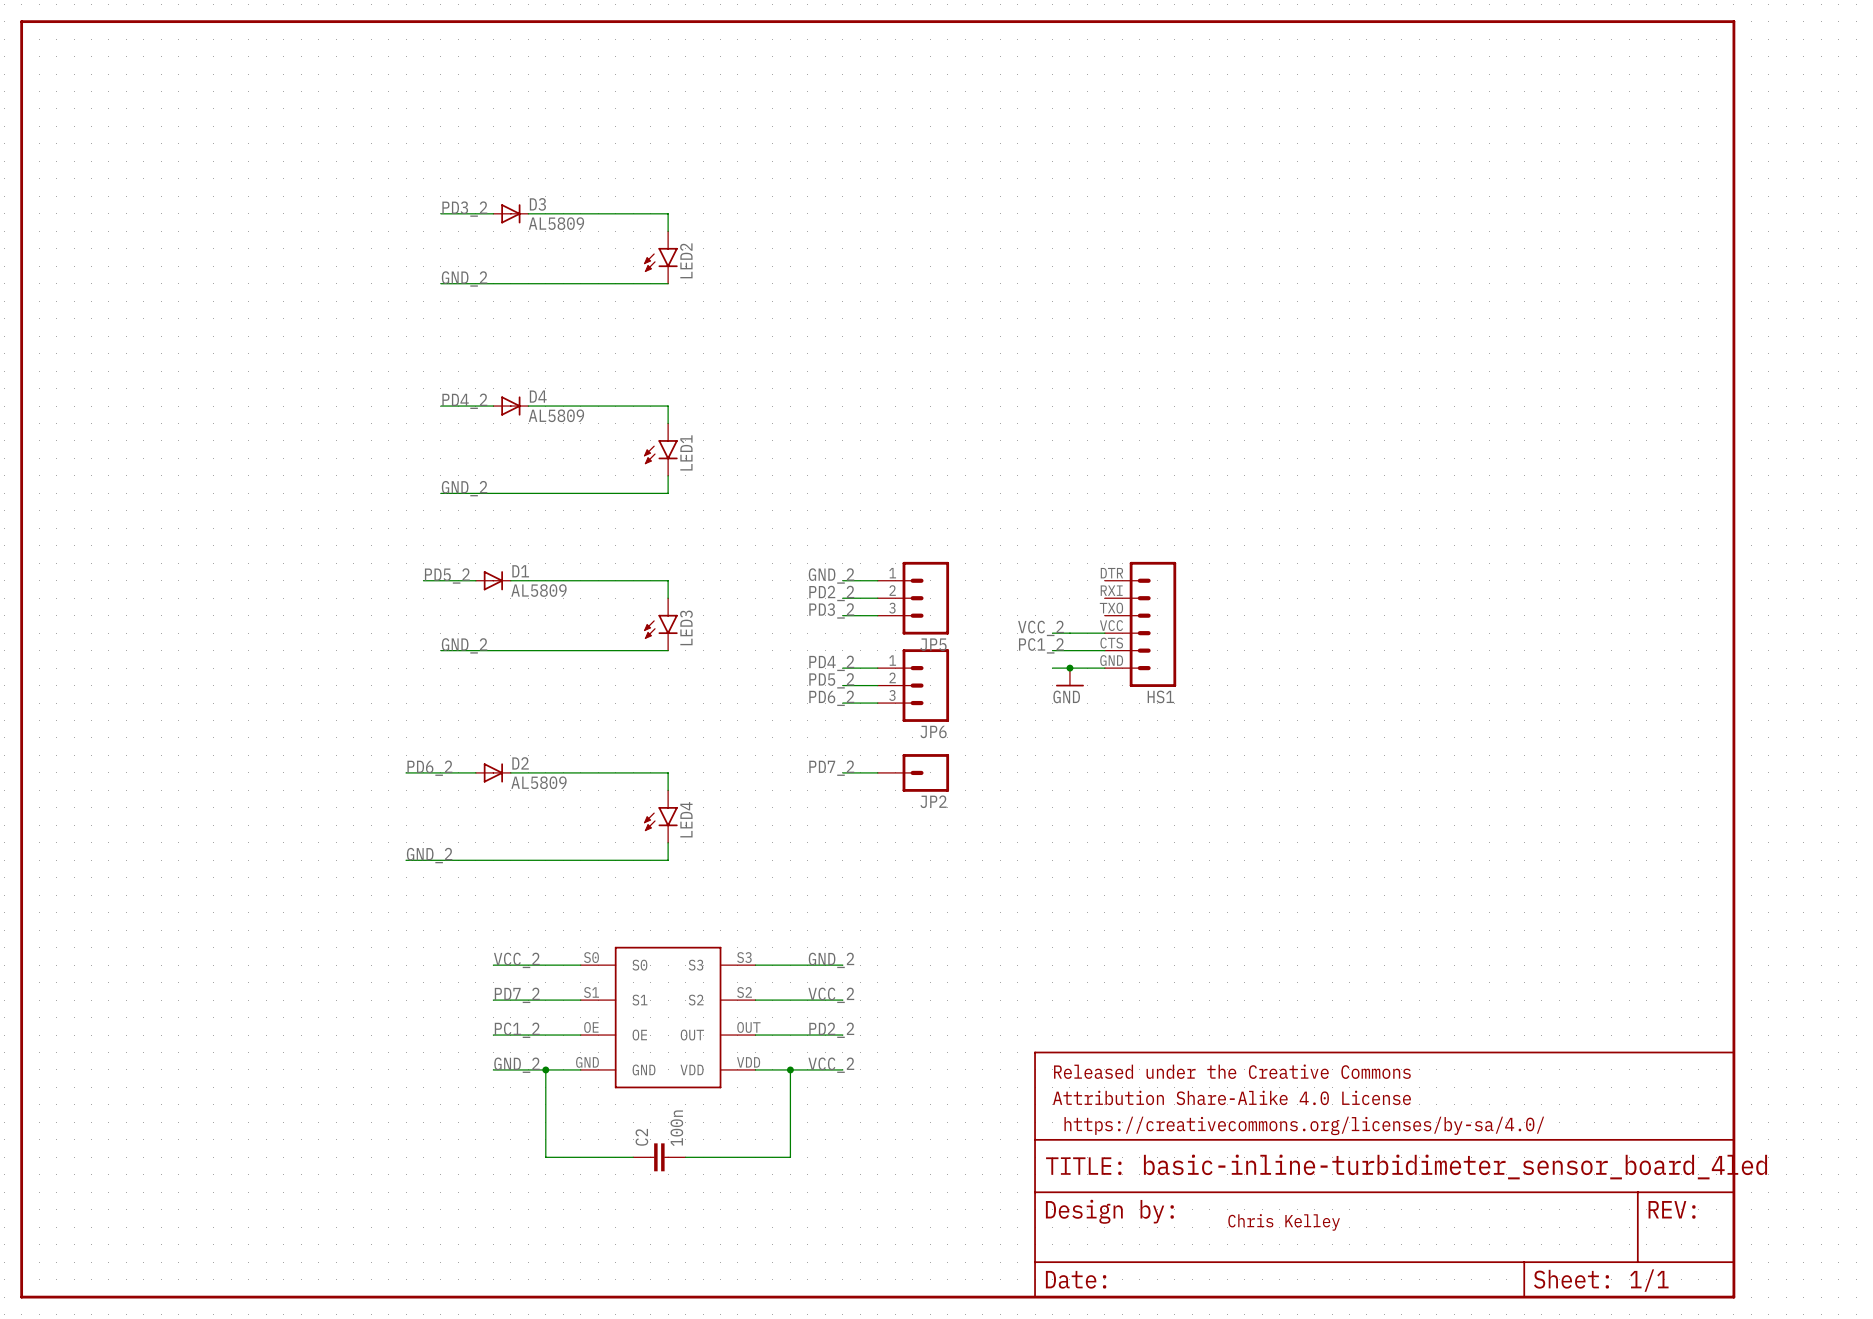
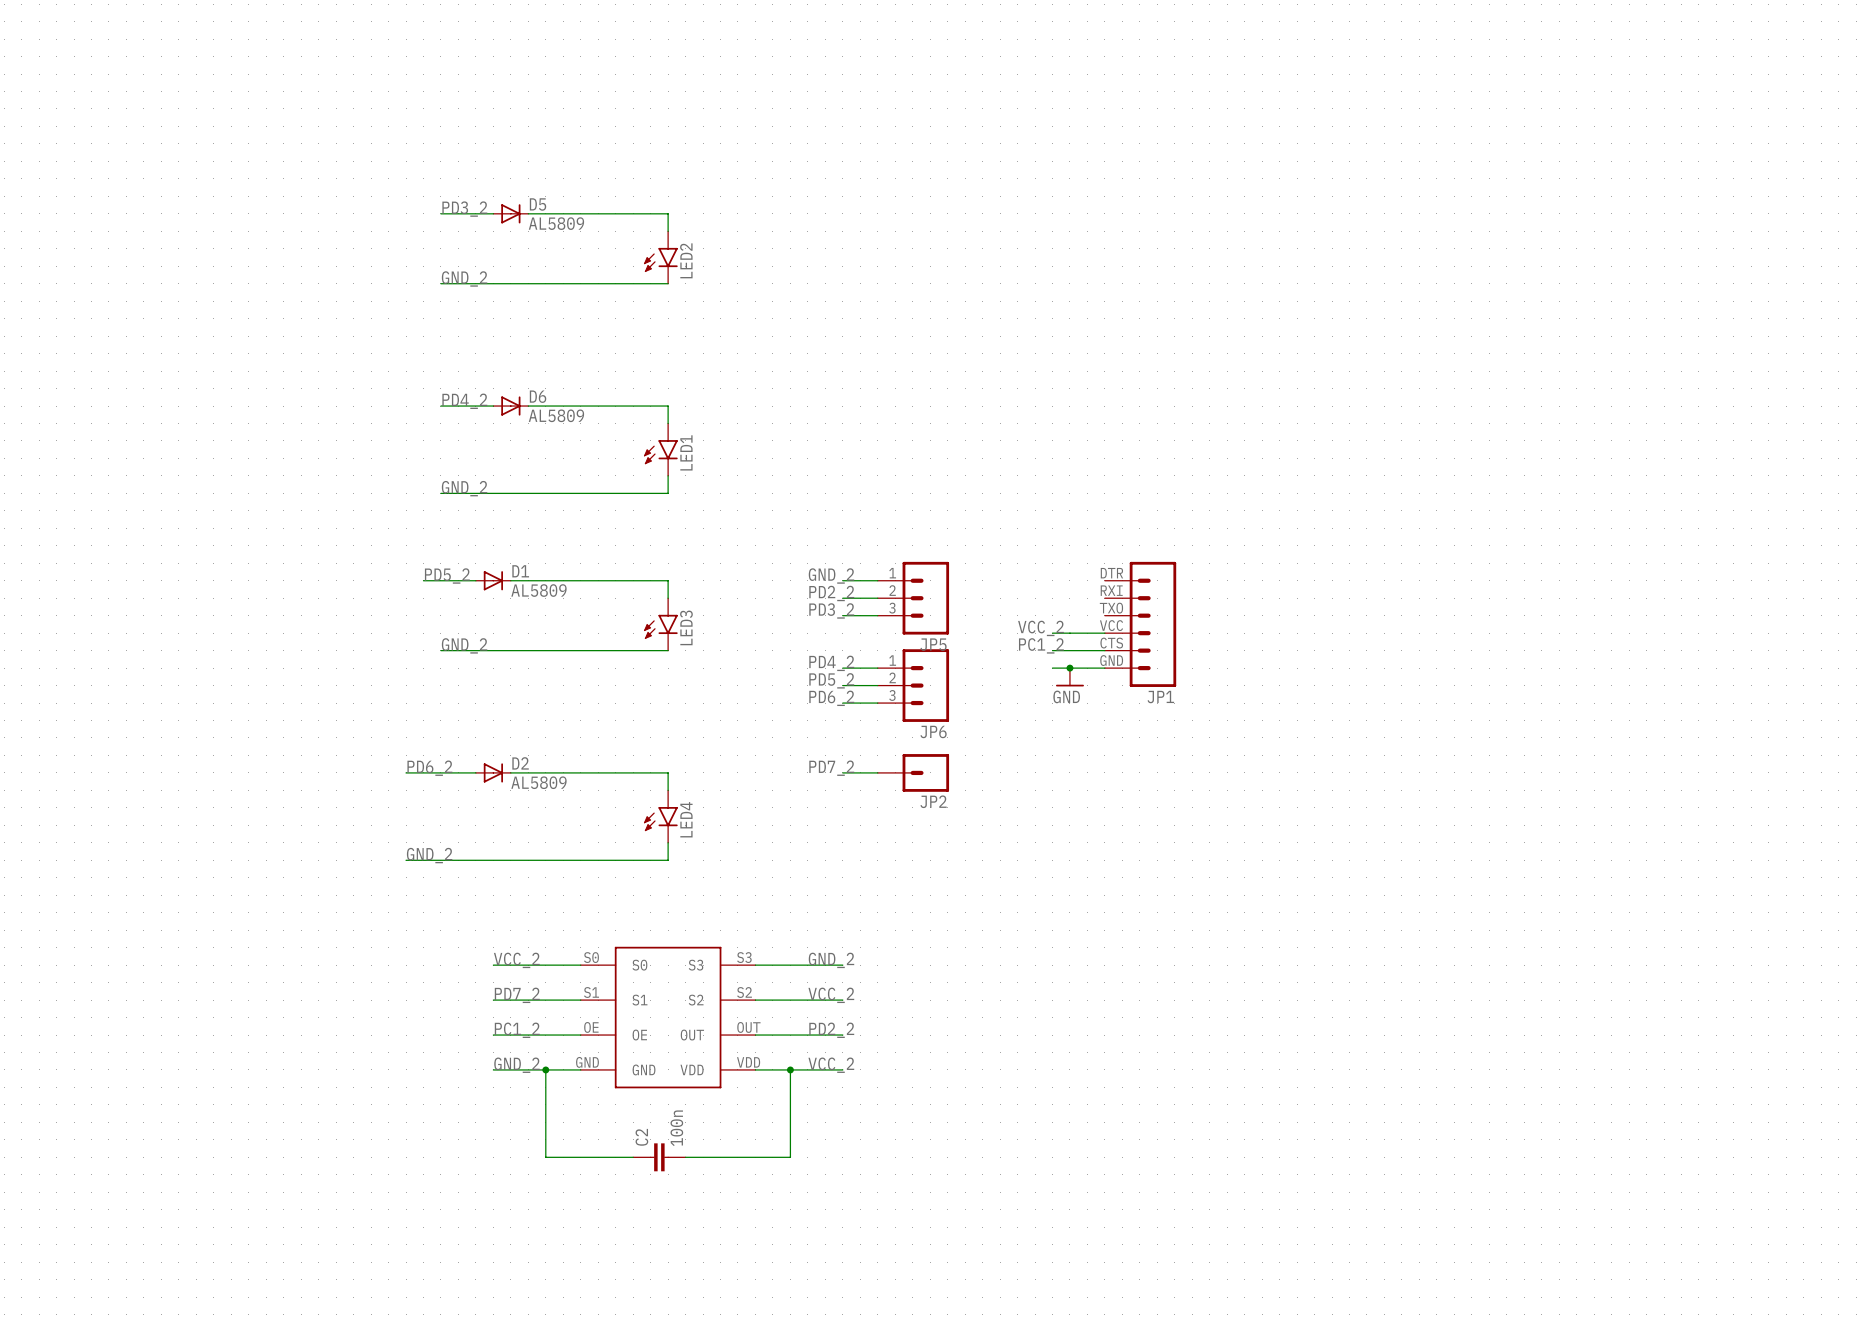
D3 name: D3 (537, 204) -> D5 (538, 204)
D4 name: D4 (538, 396) -> D6 (538, 396)
part: (877, 659) -> none
HS1 name: HS1 (1160, 696) -> JP1 (1160, 697)
part: (1384, 1174) -> none
text: Chris Kelley (1284, 1222) -> none

